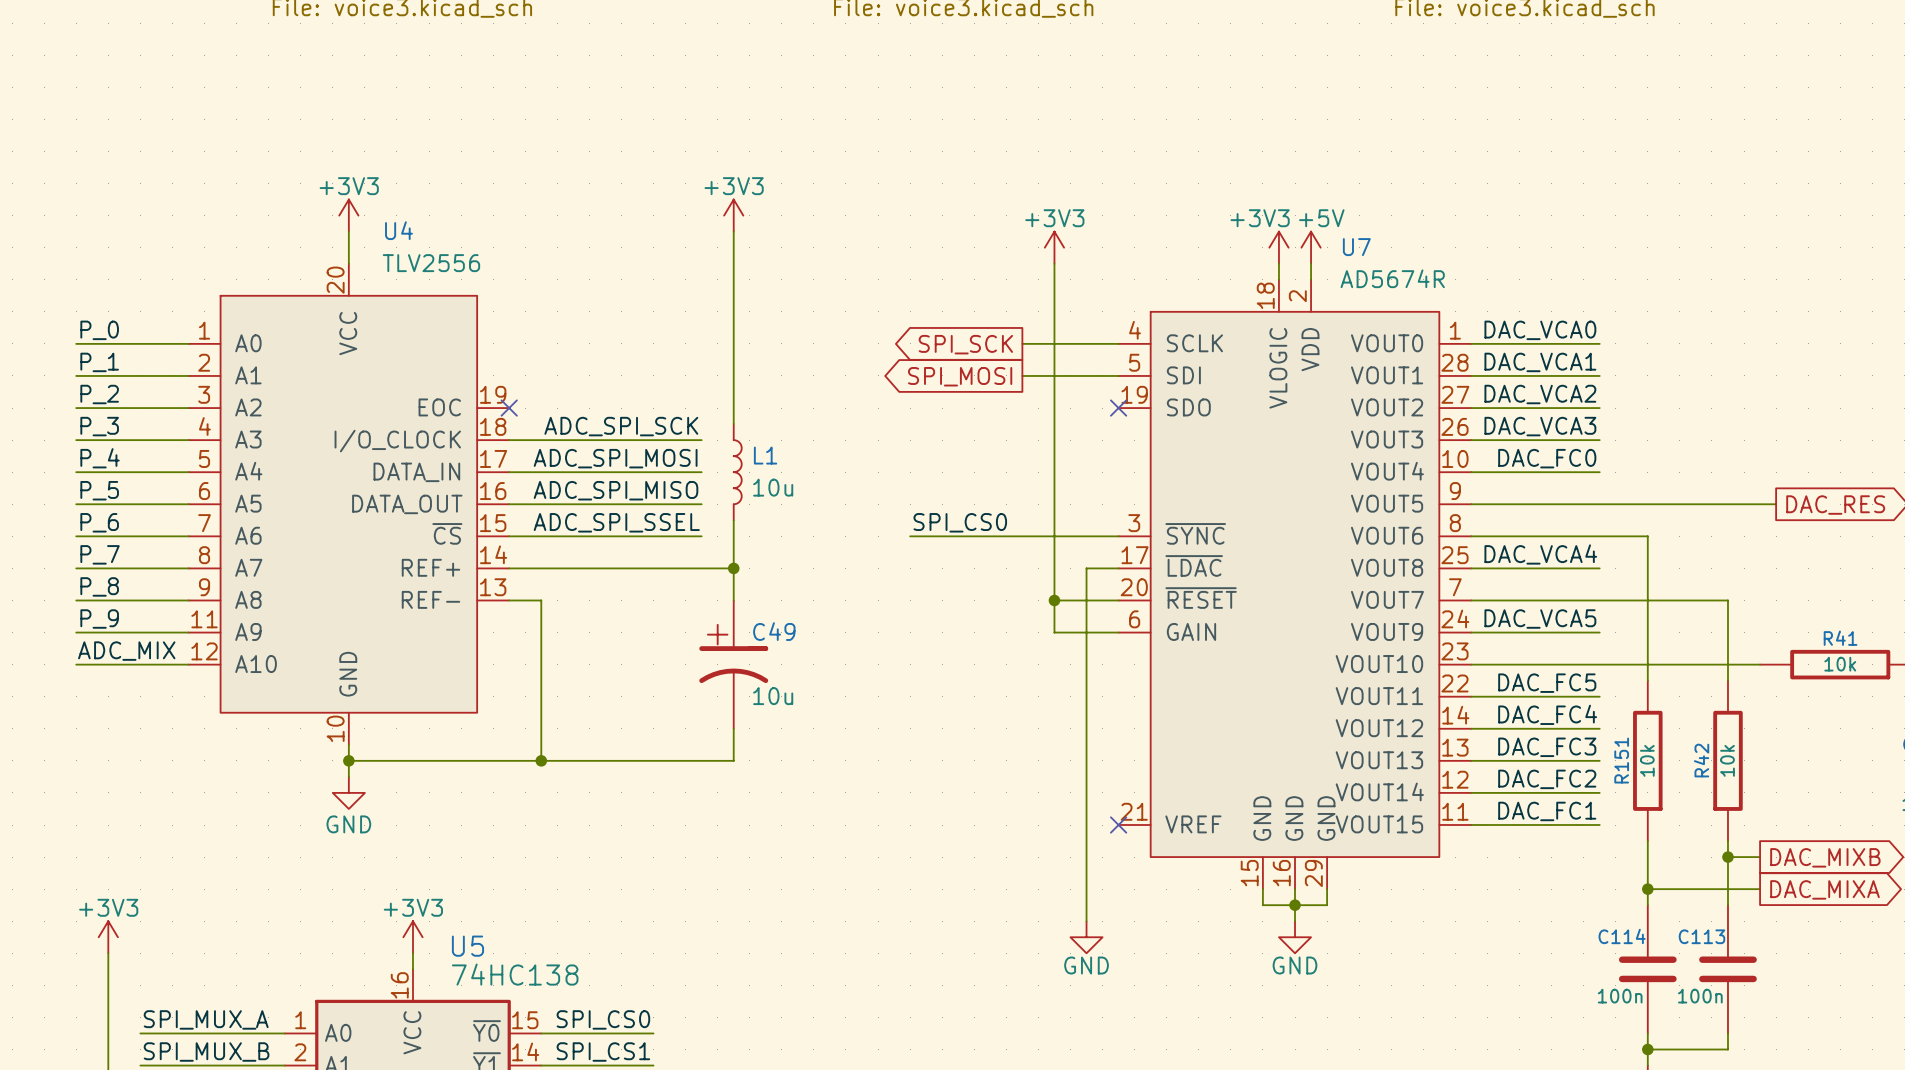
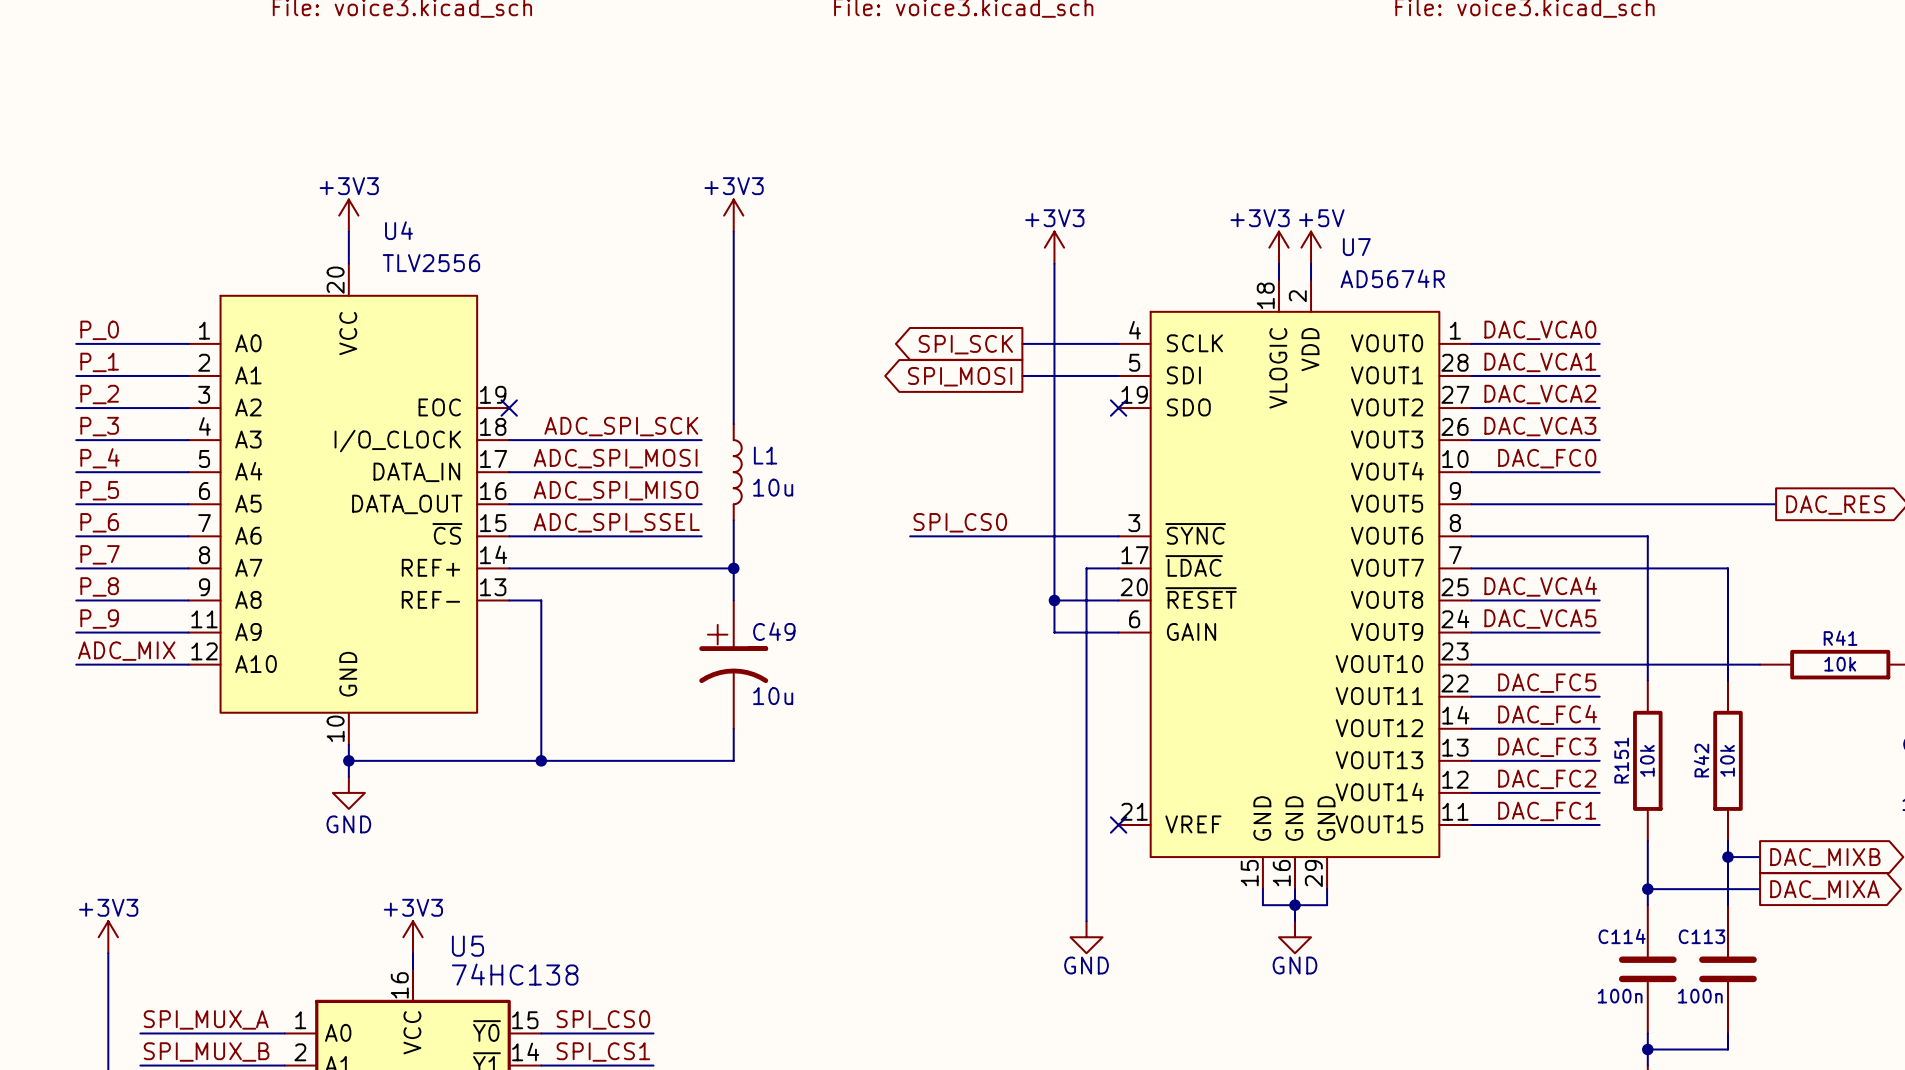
label position: DAC_VCA4 (1540, 554) -> DAC_VCA4 (1540, 586)
U7 pin number: 25 (1454, 555) -> 7 (1455, 555)
U7 pin name: VOUT8 (1387, 567) -> VOUT7 (1387, 567)
U7 pin number: 7 (1455, 587) -> 25 (1454, 587)
U7 pin name: VOUT7 (1387, 599) -> VOUT8 (1387, 599)
wire: (1599, 600) (1727, 600) -> (1599, 568) (1727, 568) (1727, 600)

